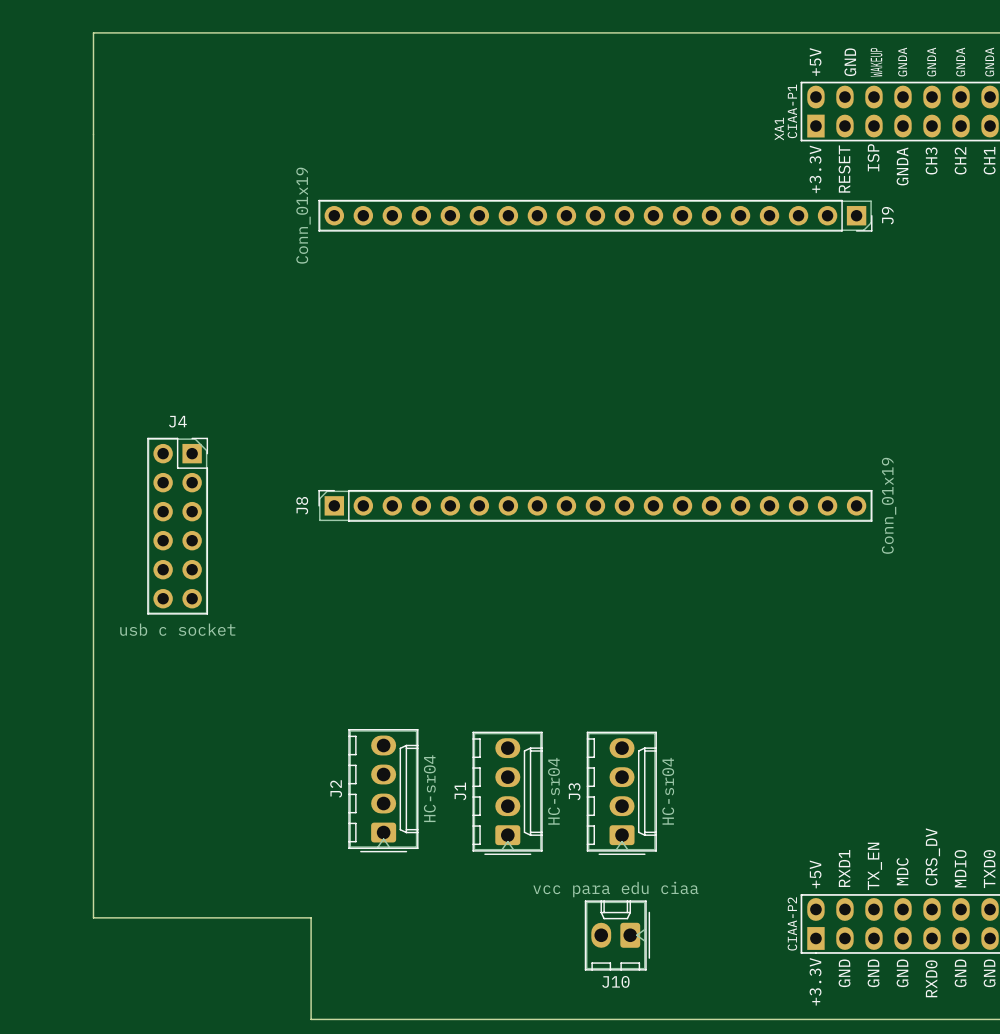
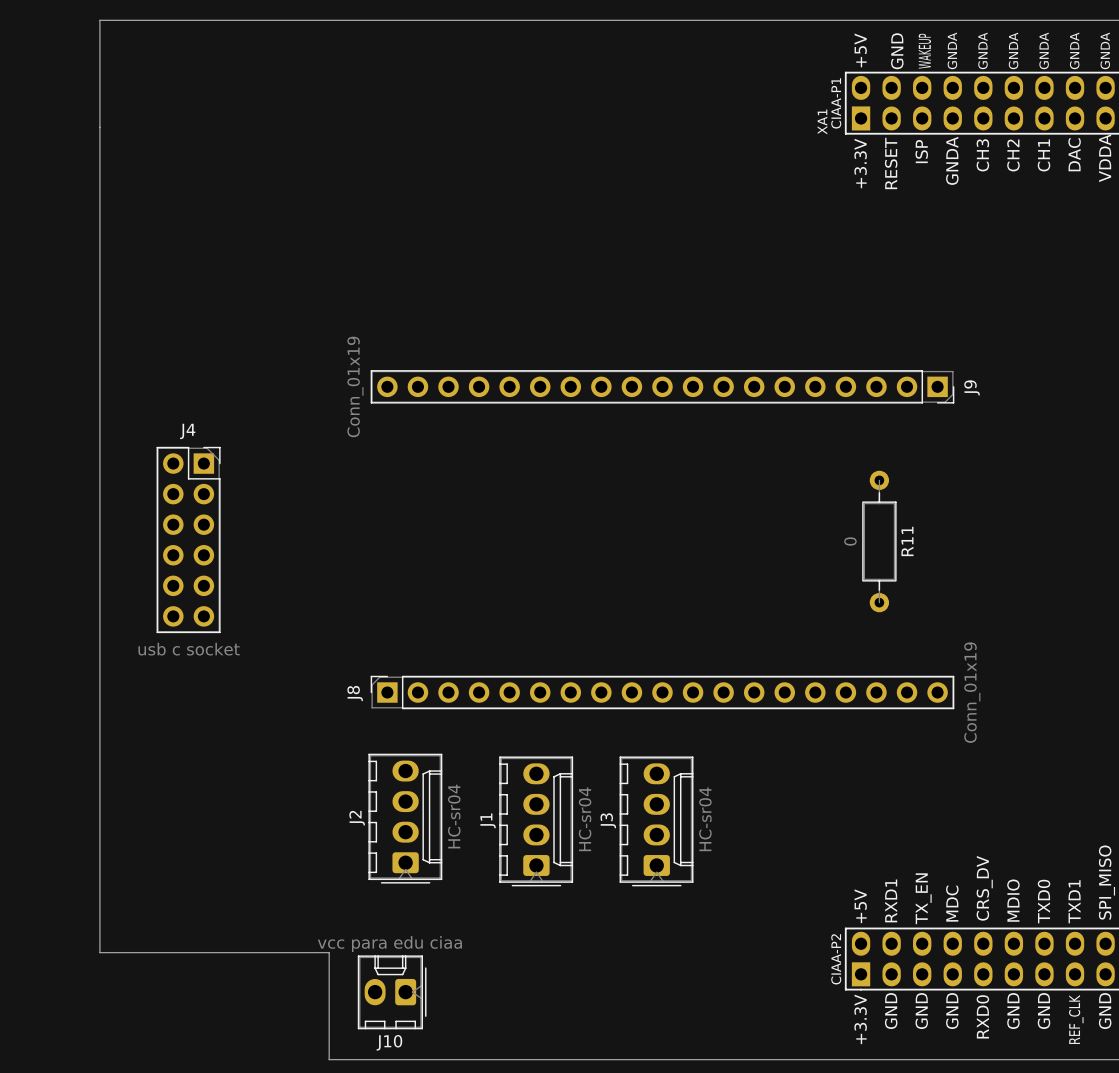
J9 position: (595, 215) -> (662, 386)
J8 position: (595, 505) -> (662, 692)
R11: none -> 0 (879, 541)
J10 position: (617, 935) -> (392, 992)

